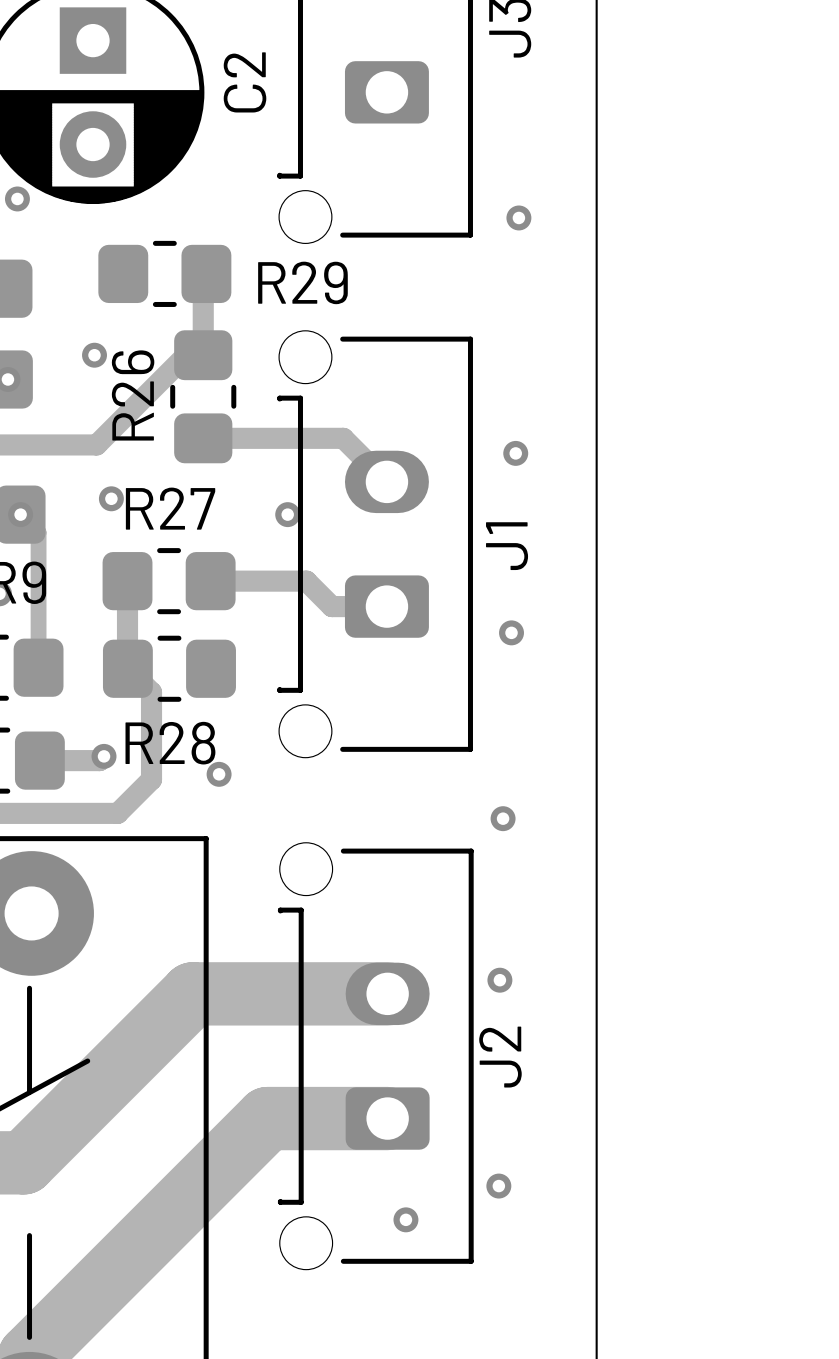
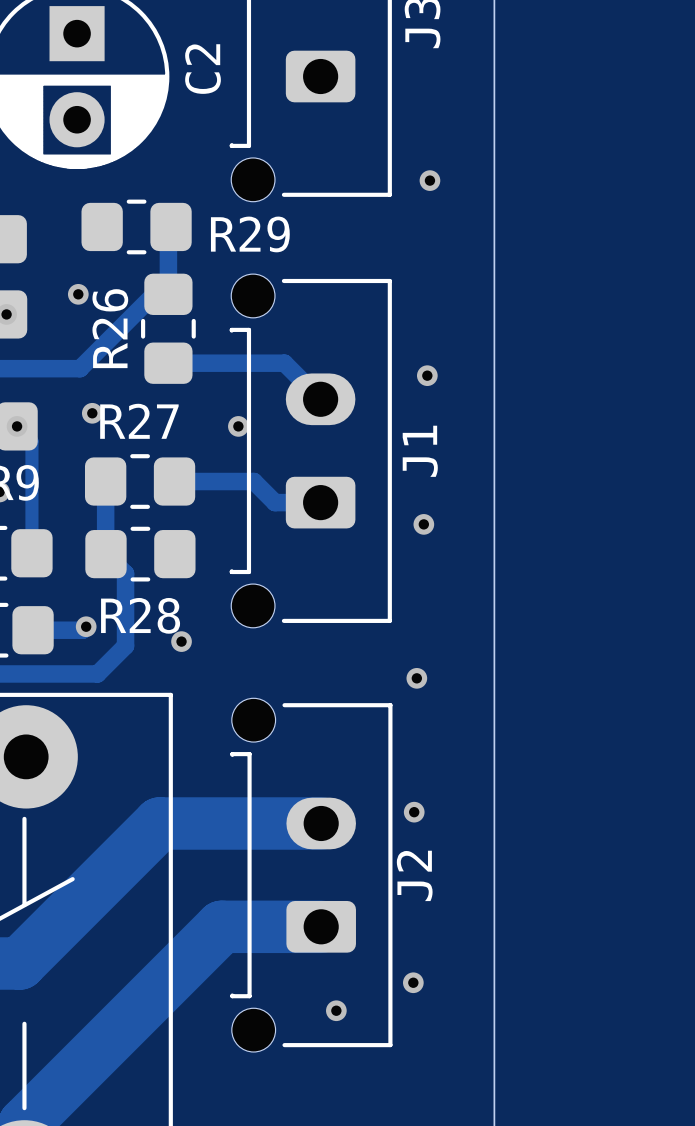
via: (17, 198) -> none

